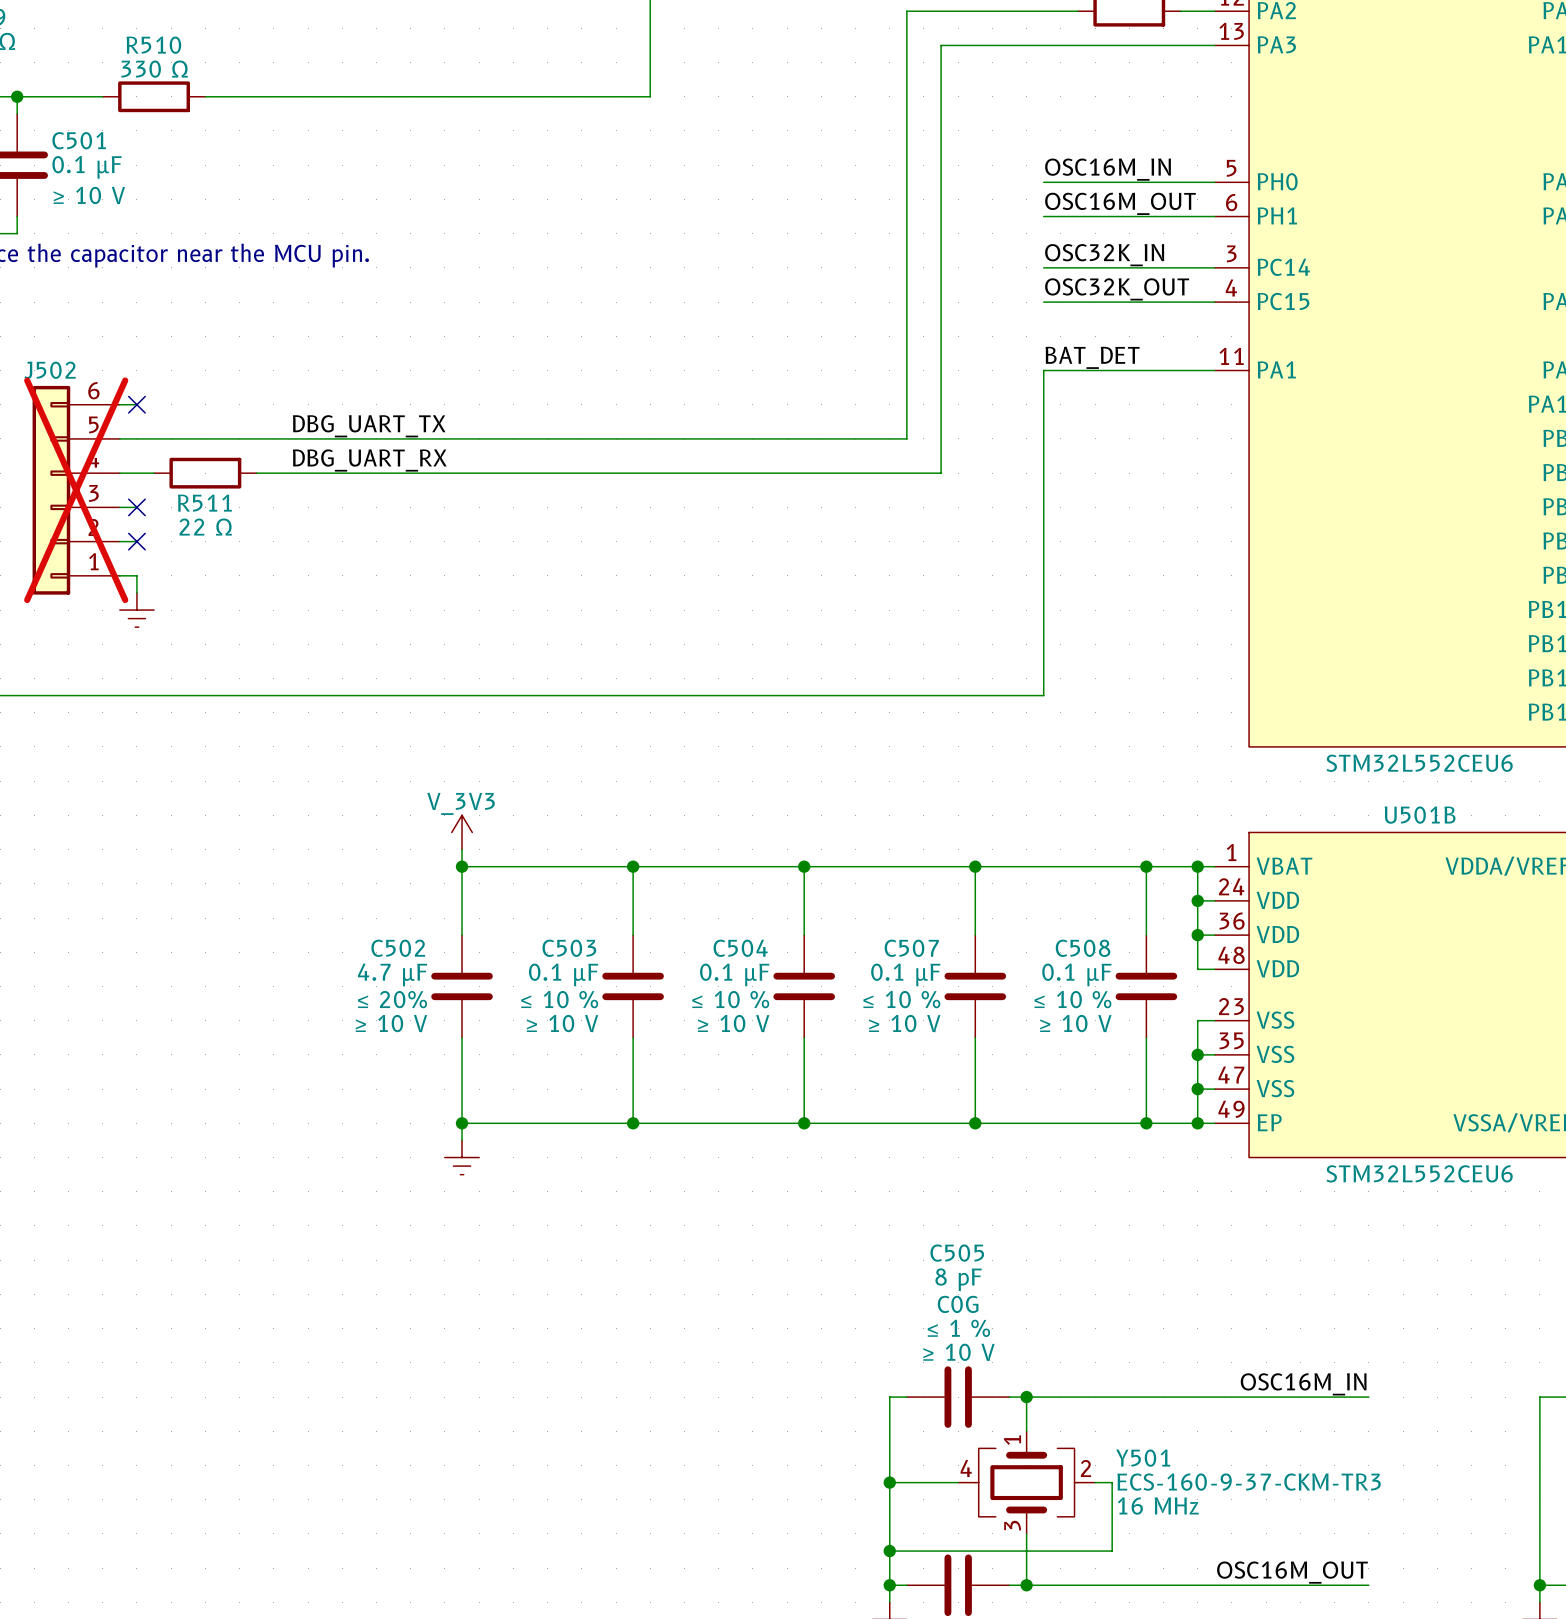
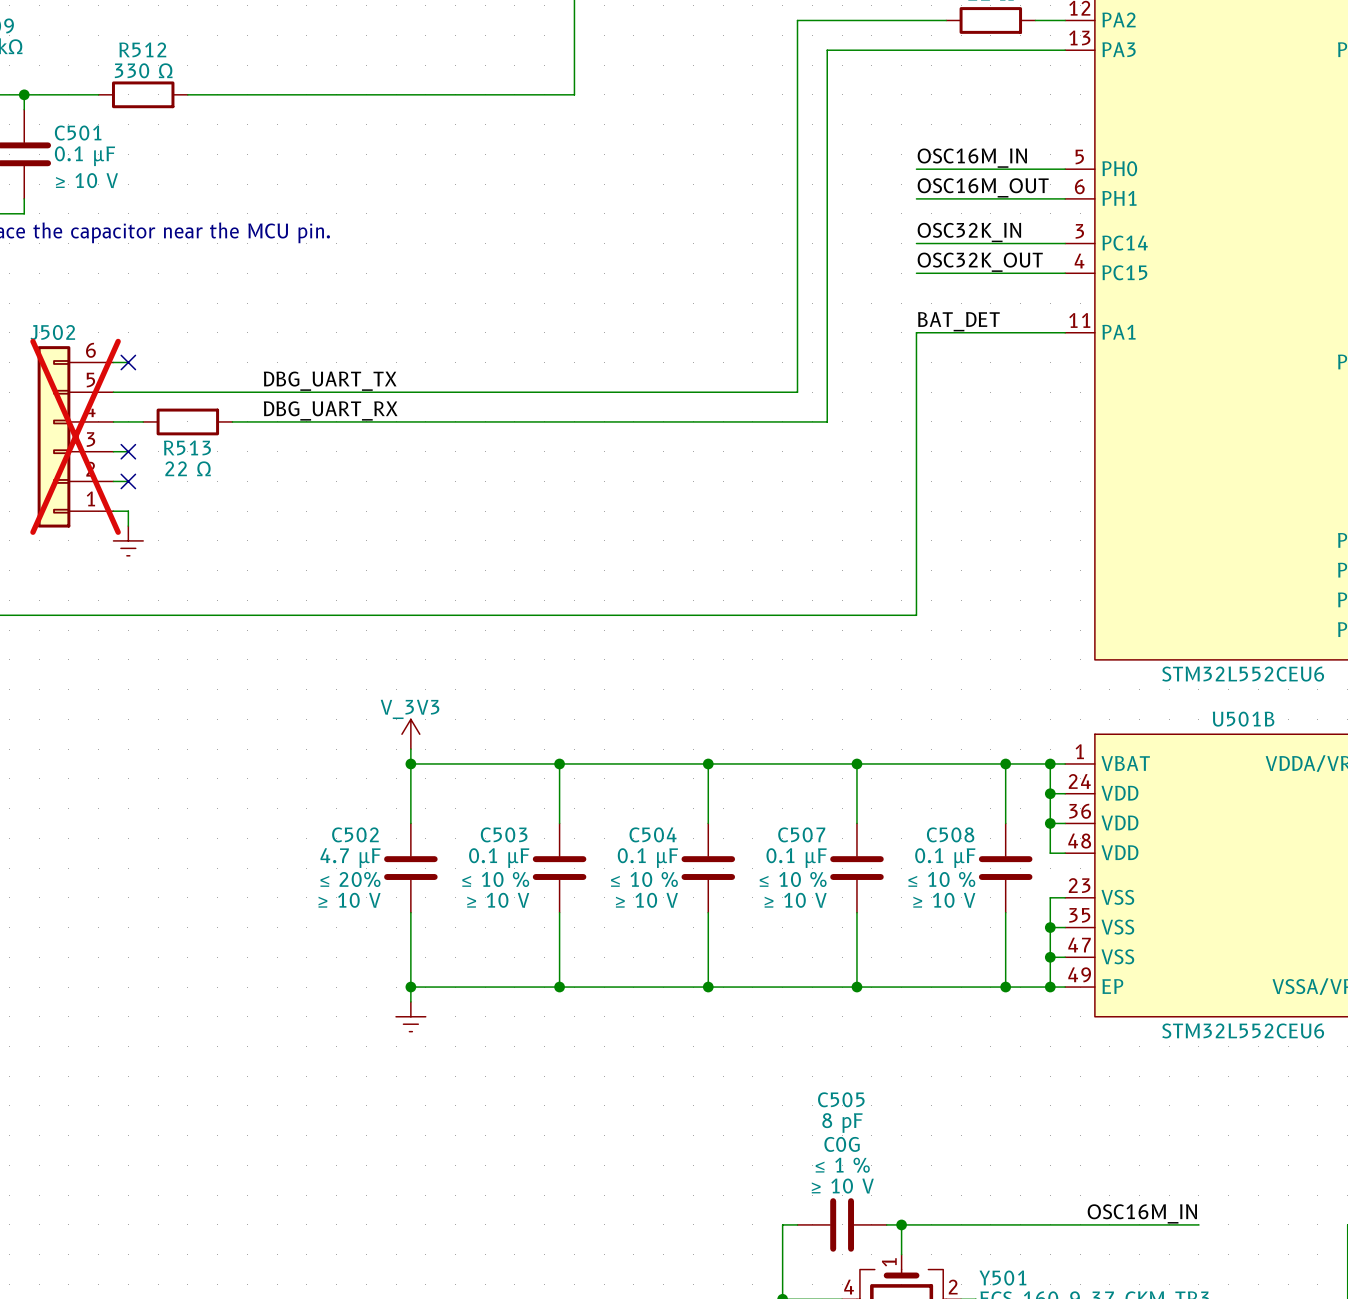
R510 name: R510 (153, 45) -> R512 (142, 49)
R511 name: R511 (204, 503) -> R513 (187, 447)

